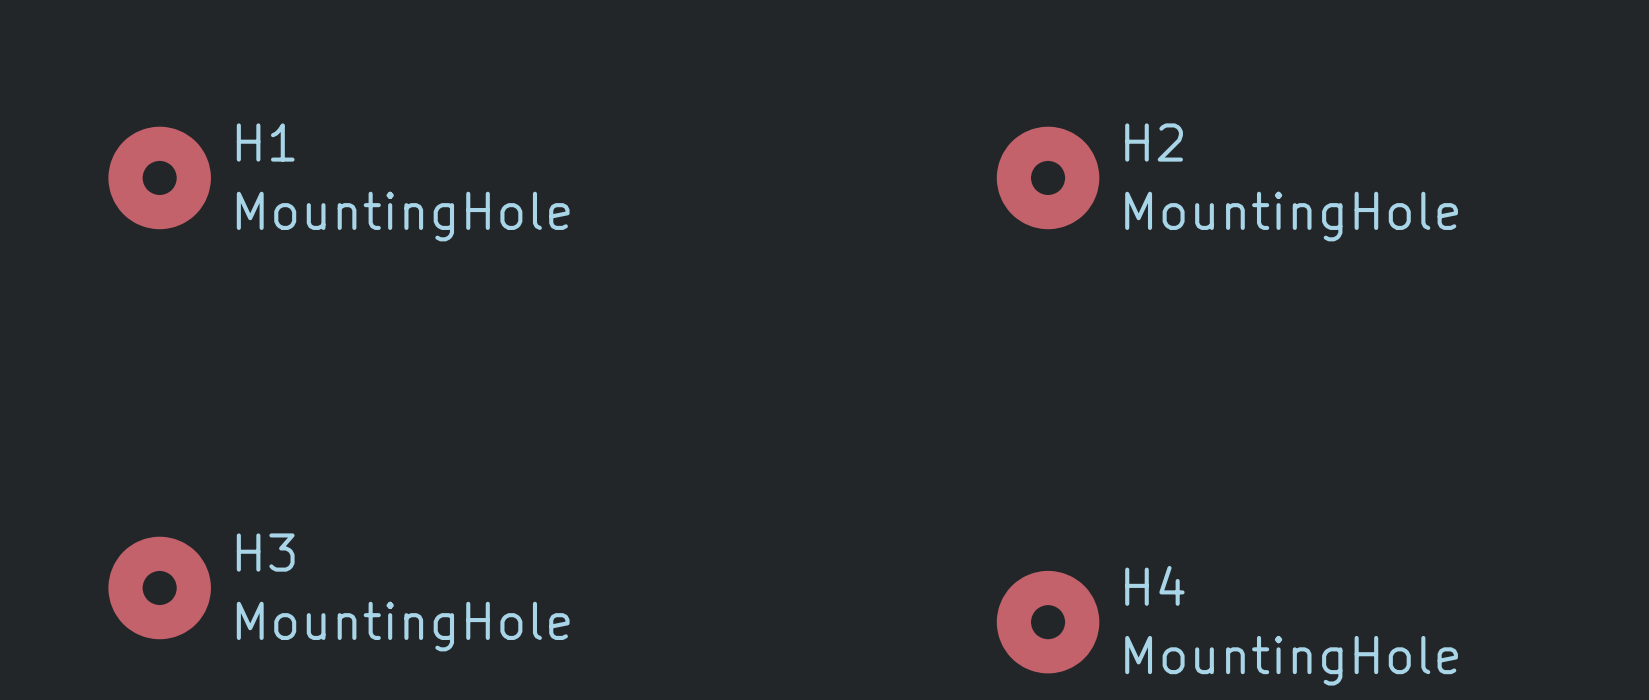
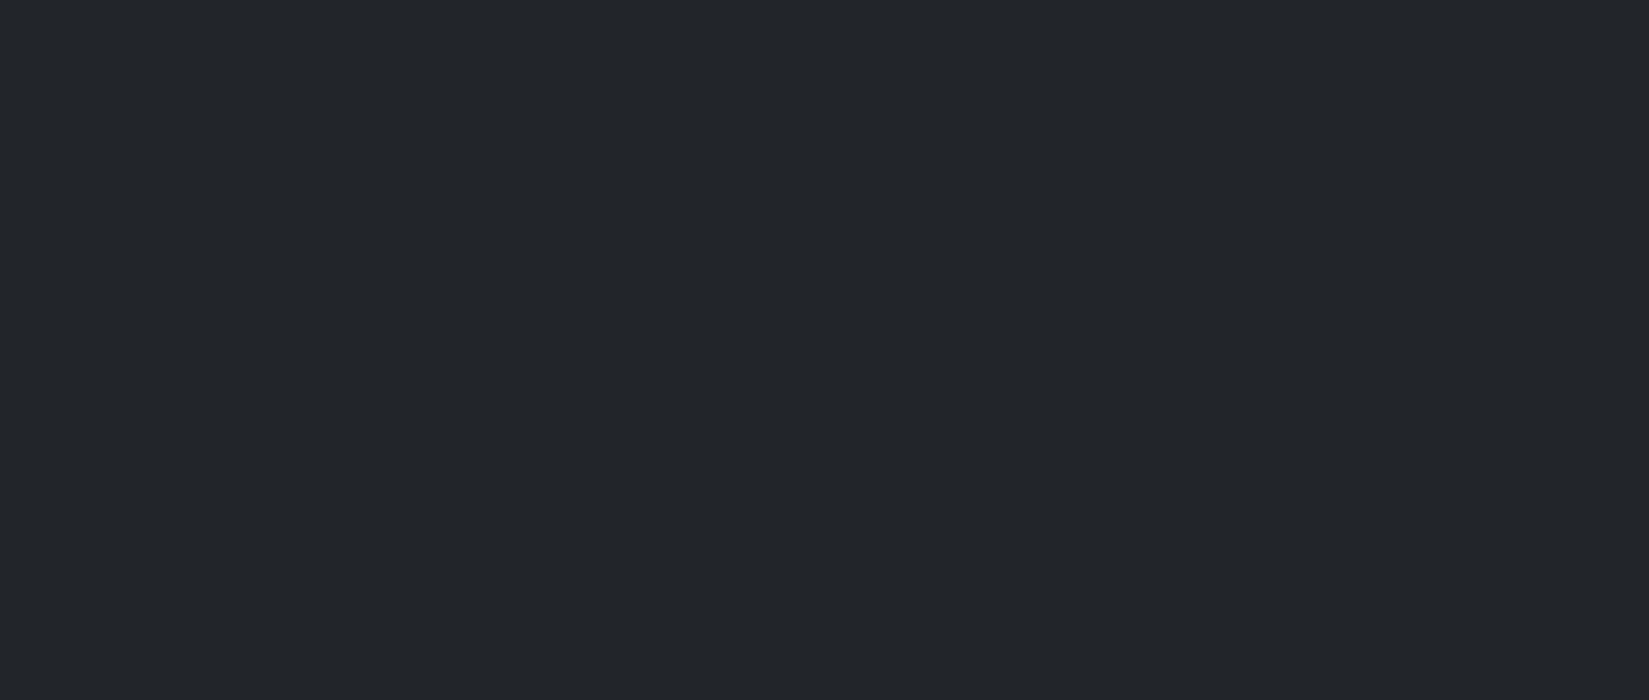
H1: MountingHole (159, 177) -> none
H2: MountingHole (1048, 177) -> none
H3: MountingHole (159, 587) -> none
H4: MountingHole (1048, 622) -> none

